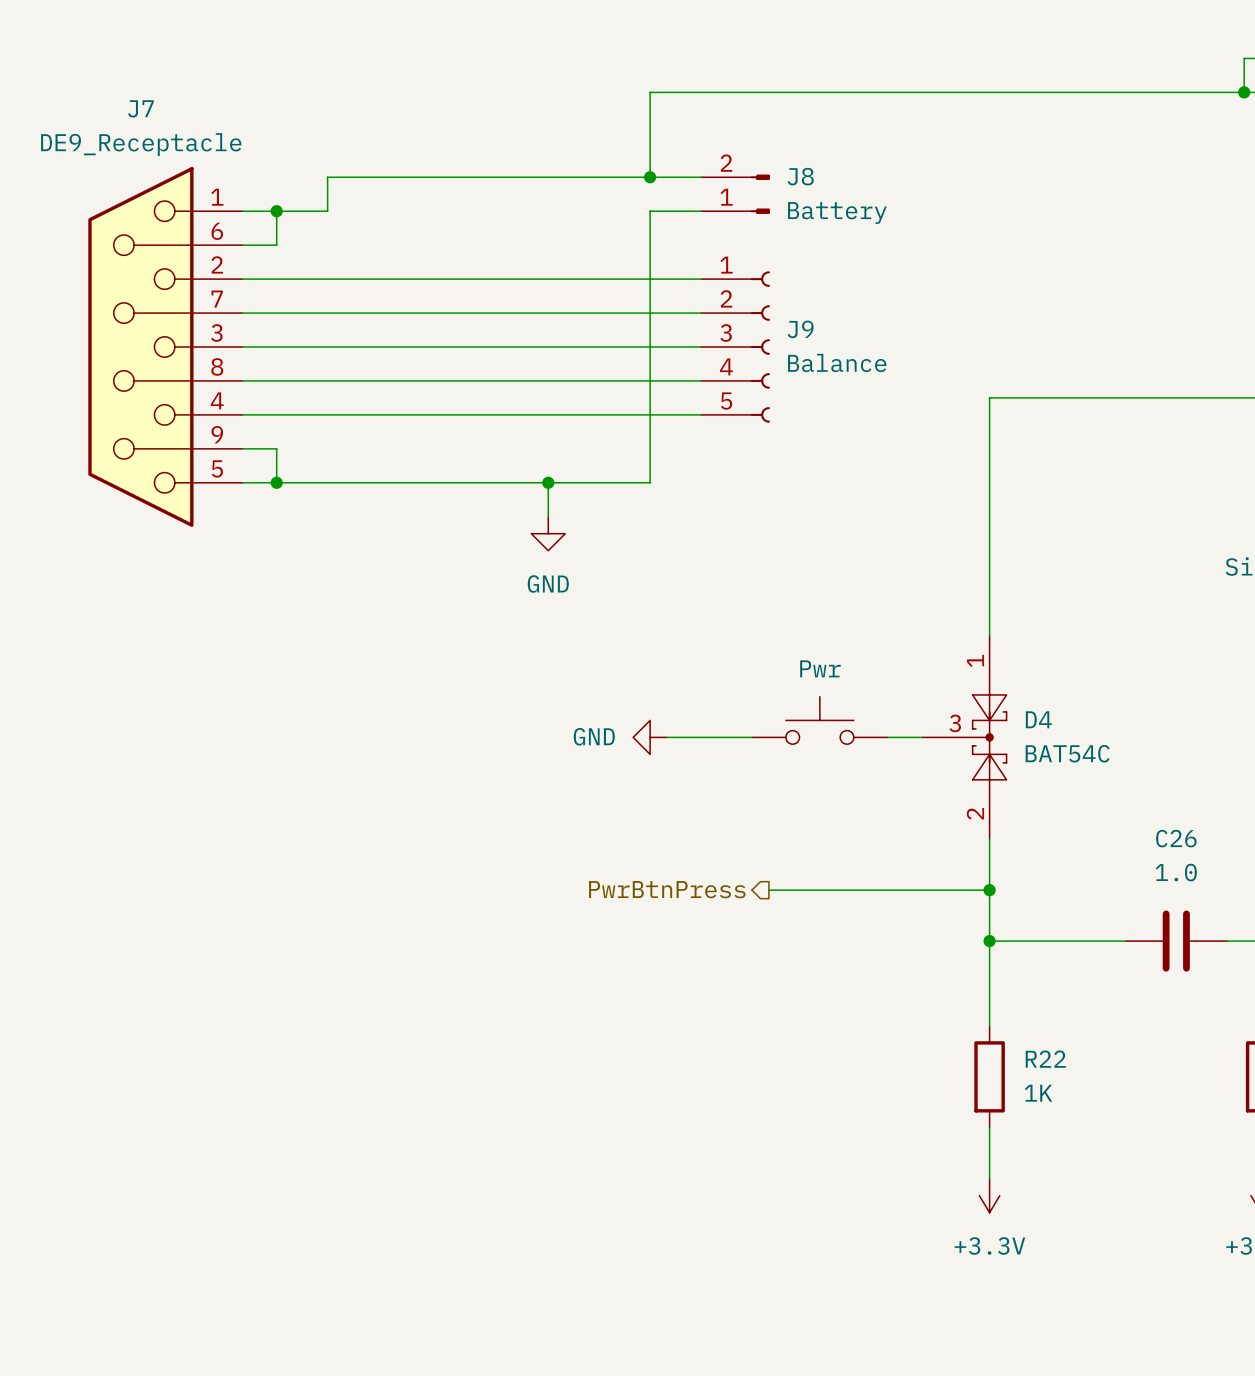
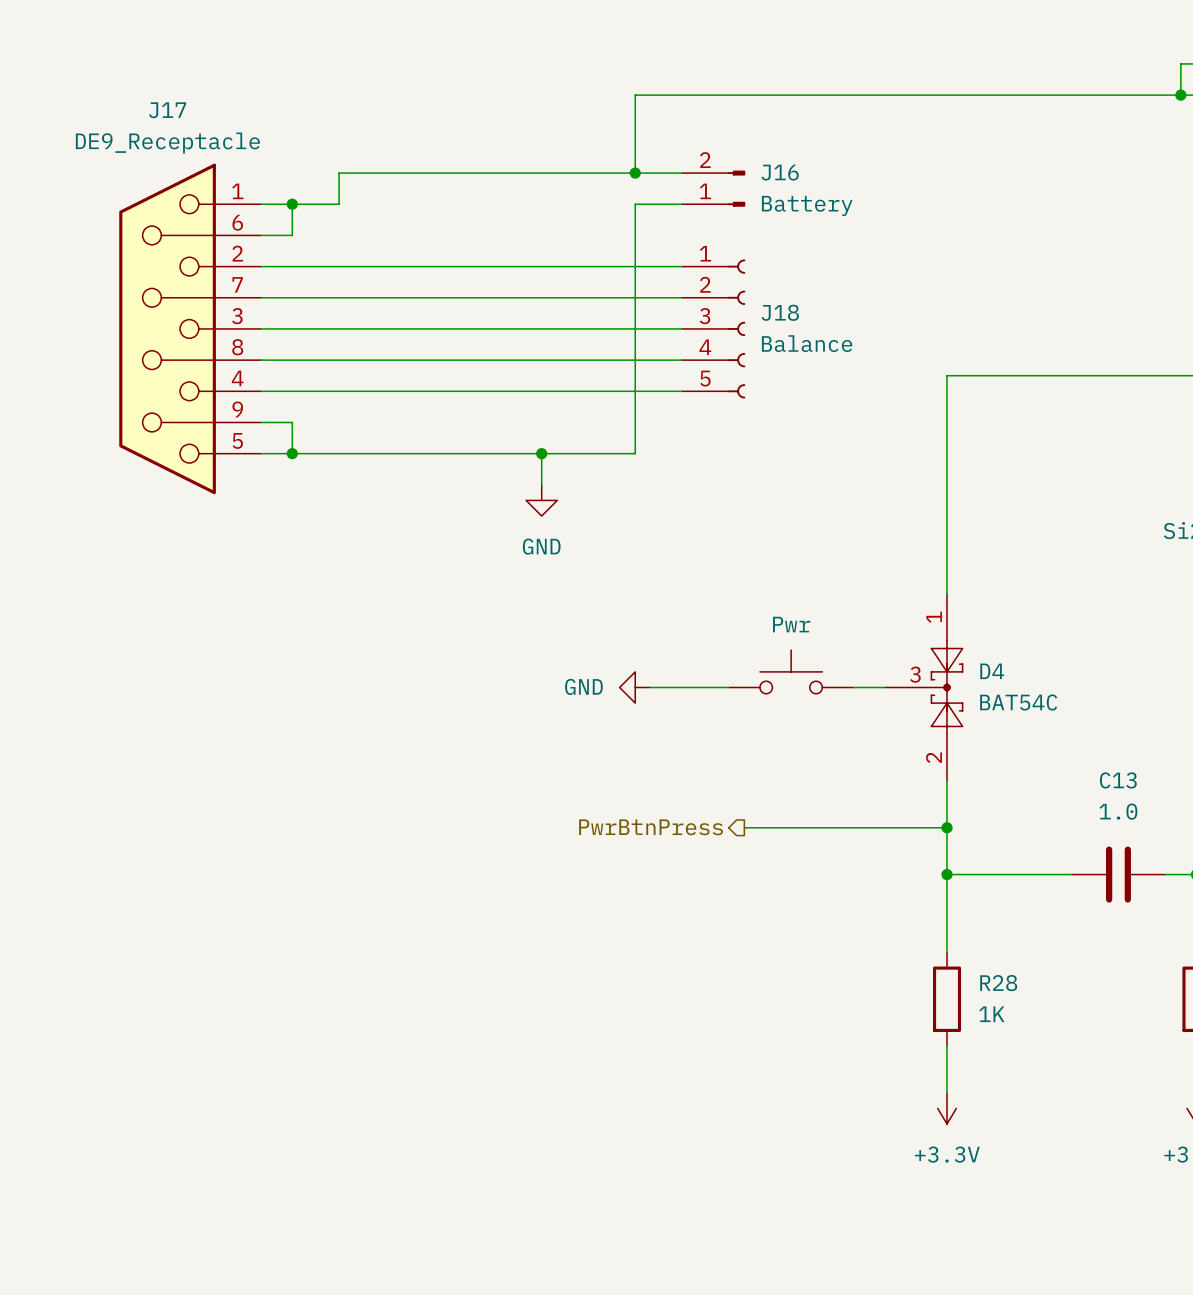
J7 name: J7 (140, 108) -> J17 (167, 110)
J8 name: J8 (800, 176) -> J16 (780, 172)
J9 name: J9 (800, 329) -> J18 (780, 312)
C26 name: C26 (1176, 838) -> C13 (1118, 780)
R22 name: R22 (1045, 1059) -> R28 (998, 983)

